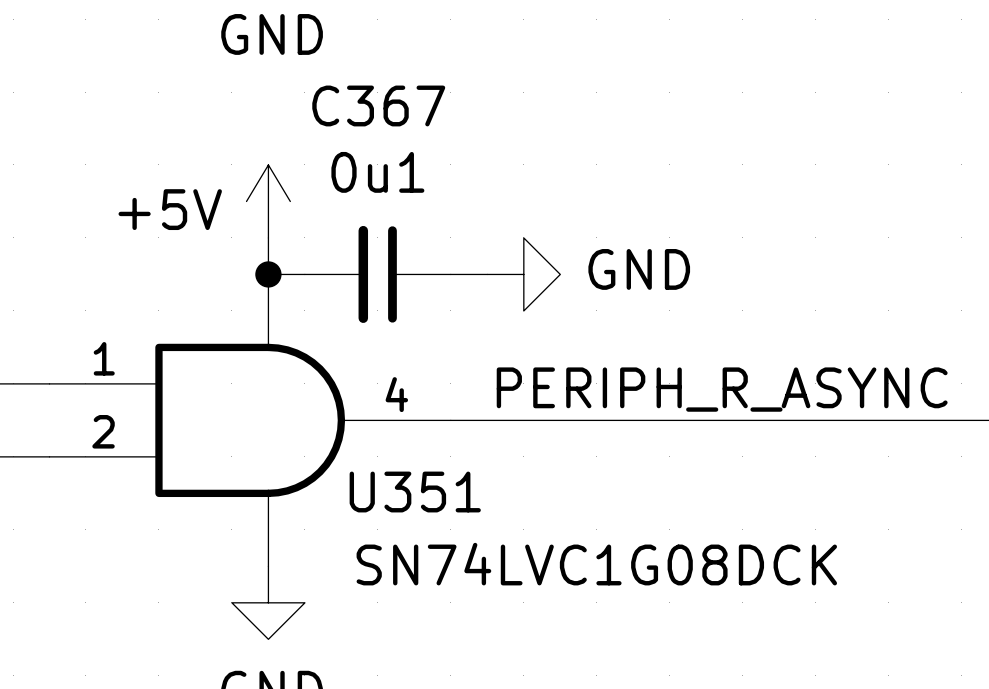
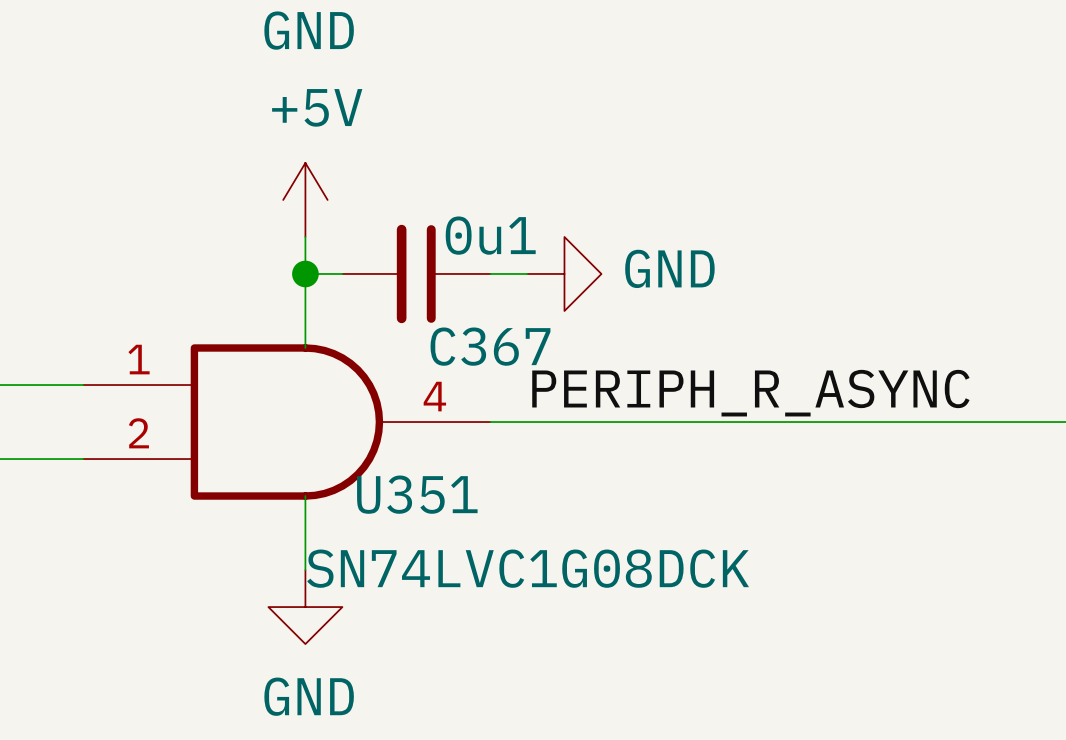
C367 name position: C367 (378, 105) -> C367 (490, 346)
C367 value position: 0u1 (377, 172) -> 0u1 (490, 235)
power symbol text position: +5V (170, 209) -> +5V (317, 107)
U351 name position: U351 (415, 492) -> U351 (417, 494)
U351 value position: SN74LVC1G08DCK (596, 564) -> SN74LVC1G08DCK (528, 568)

